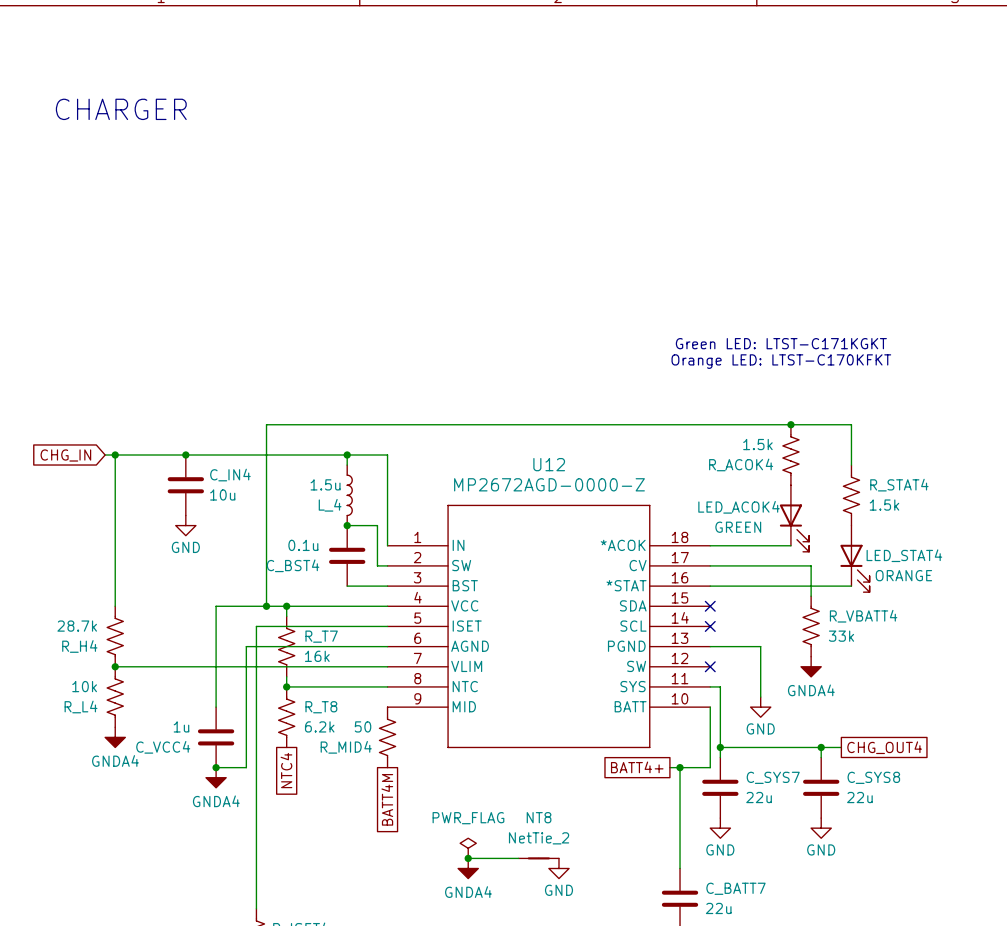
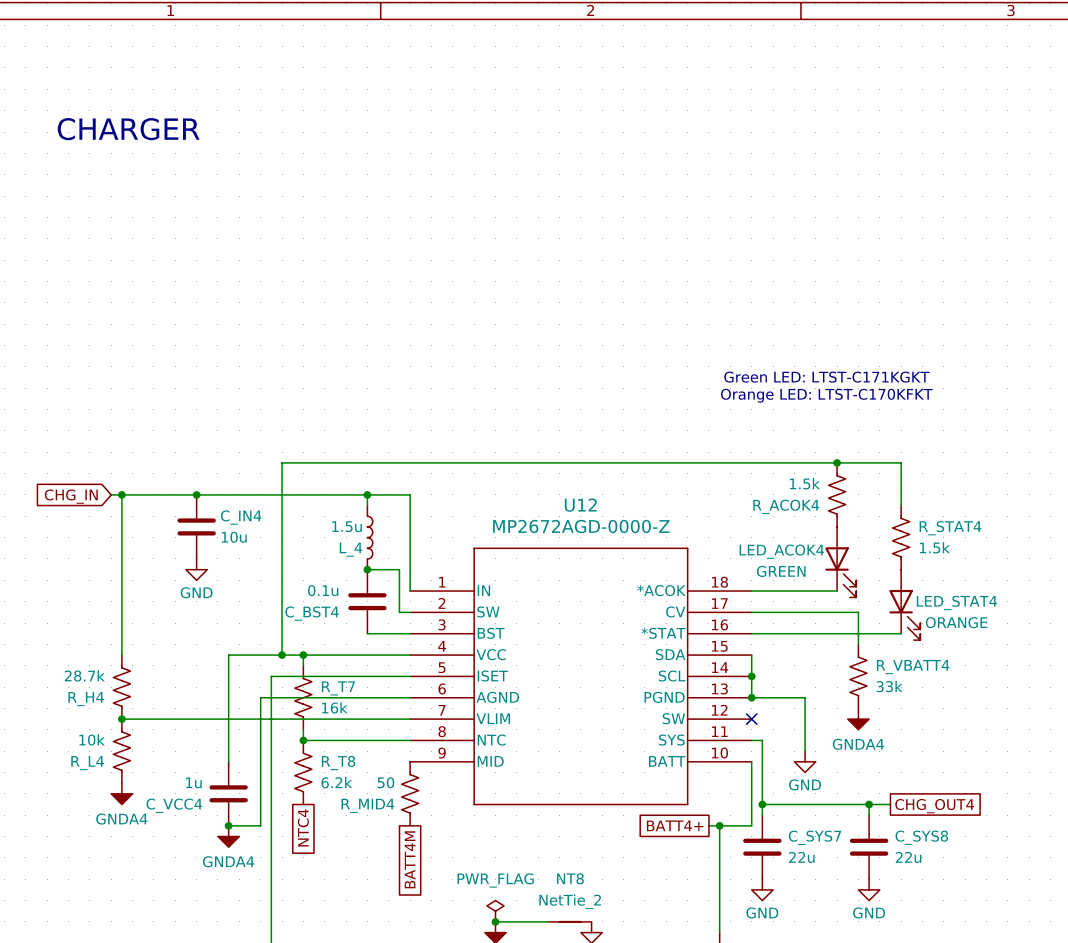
wire: none -> (751, 655) (751, 697)
no-connect mark: (710, 606) -> none
no-connect mark: (710, 626) -> none
junction: none -> (751, 676)
junction: none -> (751, 697)

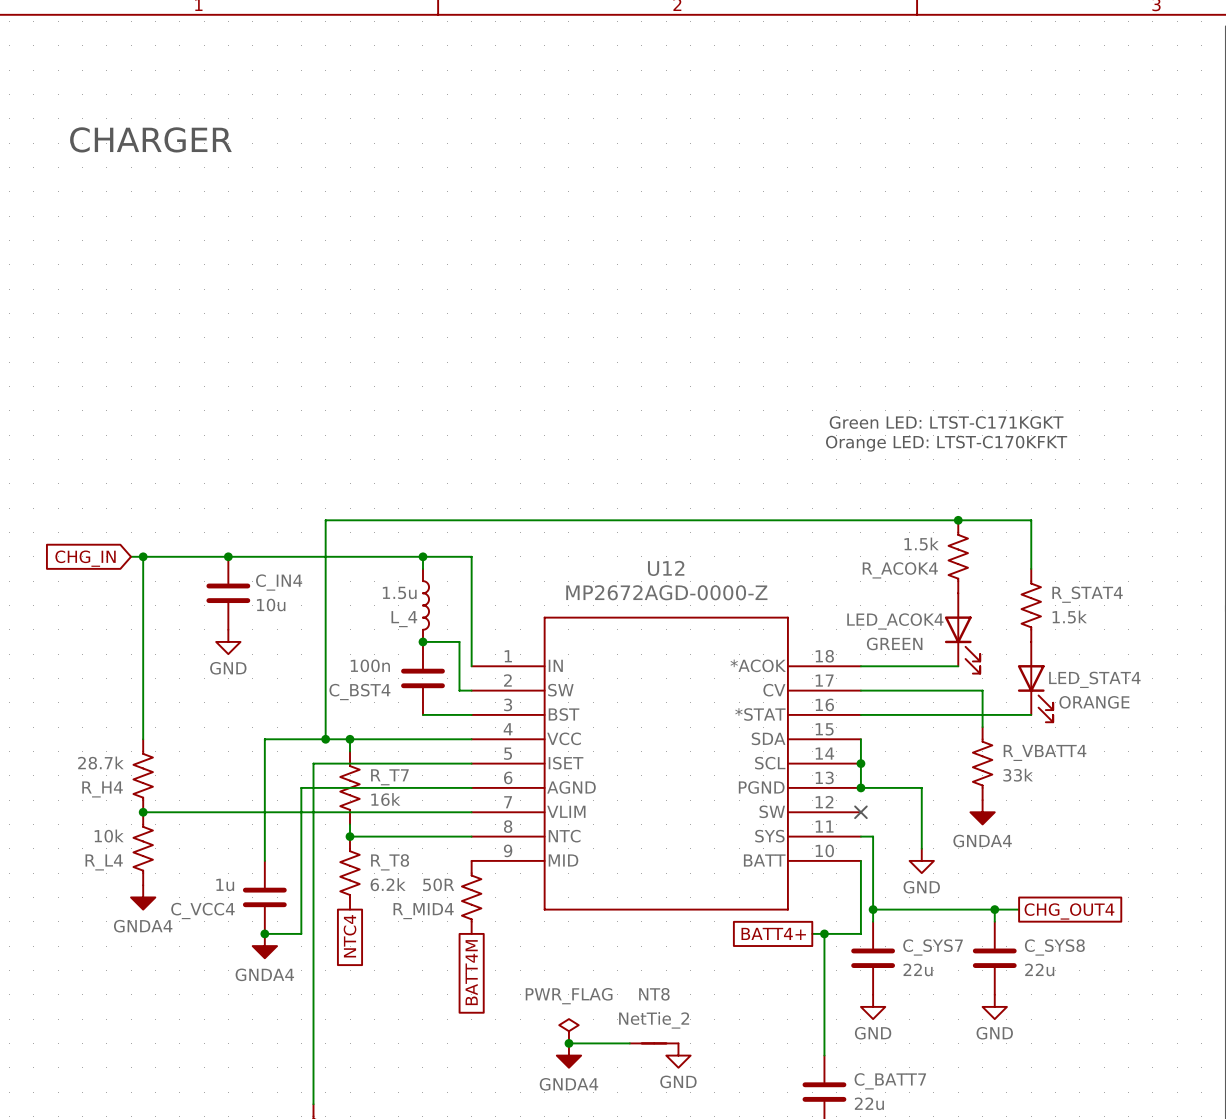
C_BST4 value: 0.1u (323, 590) -> 100n (370, 665)
R_MID4 value: 50 (385, 782) -> 50R (438, 884)

